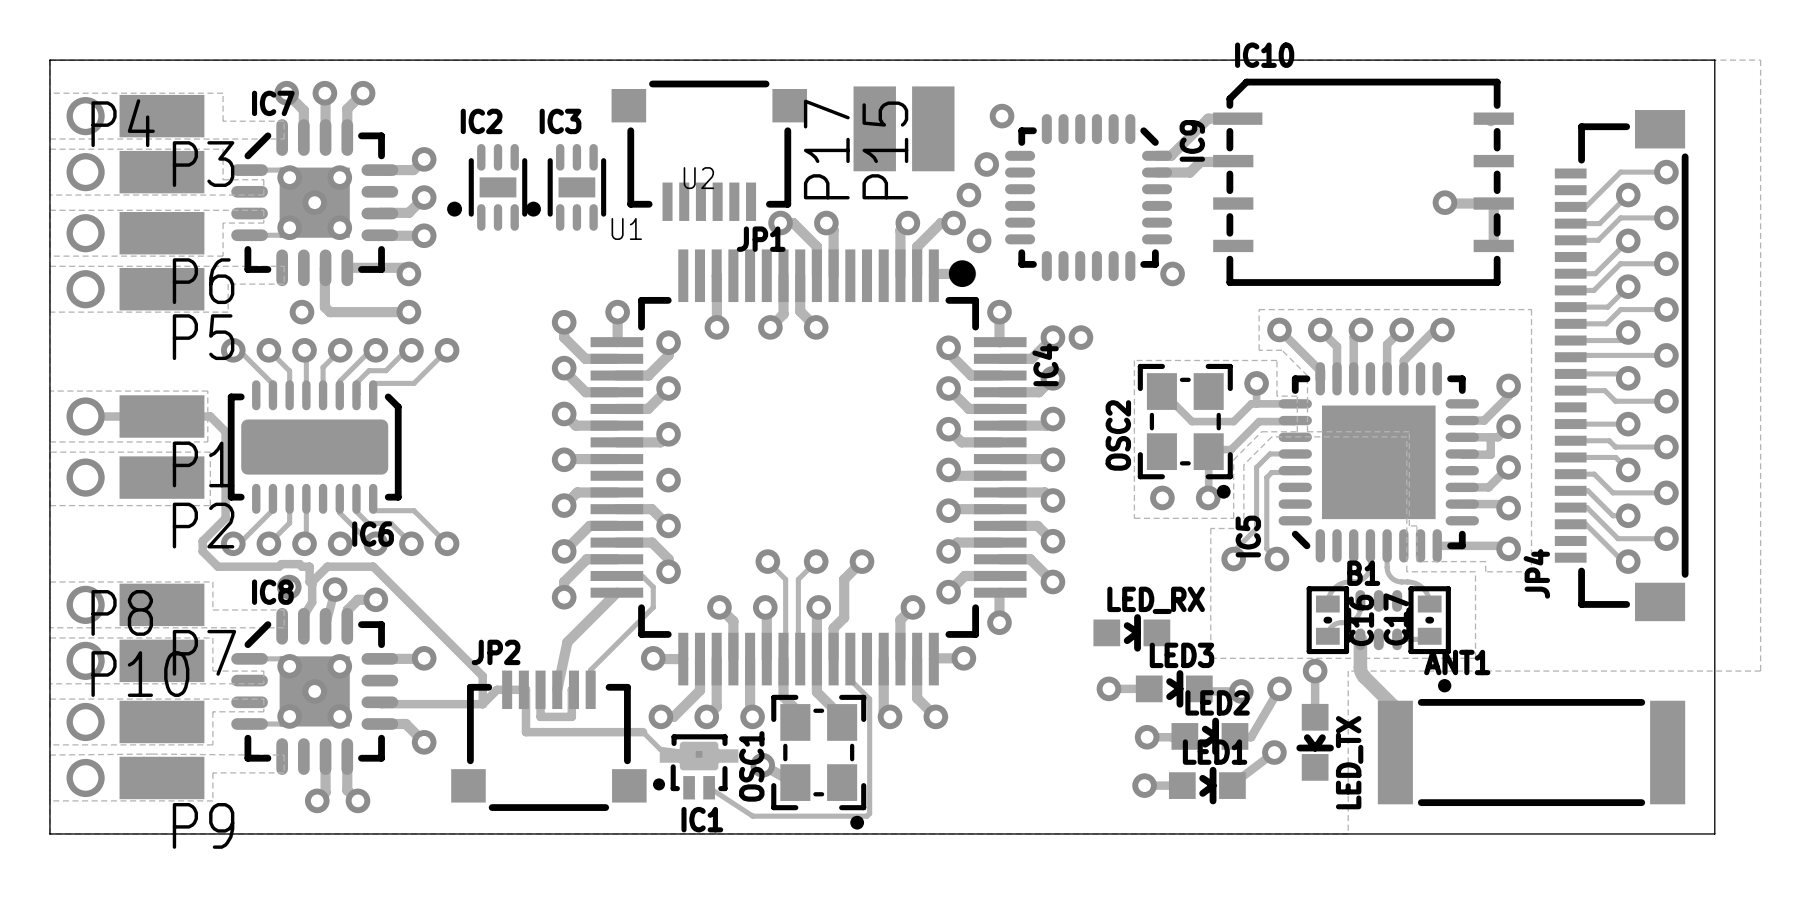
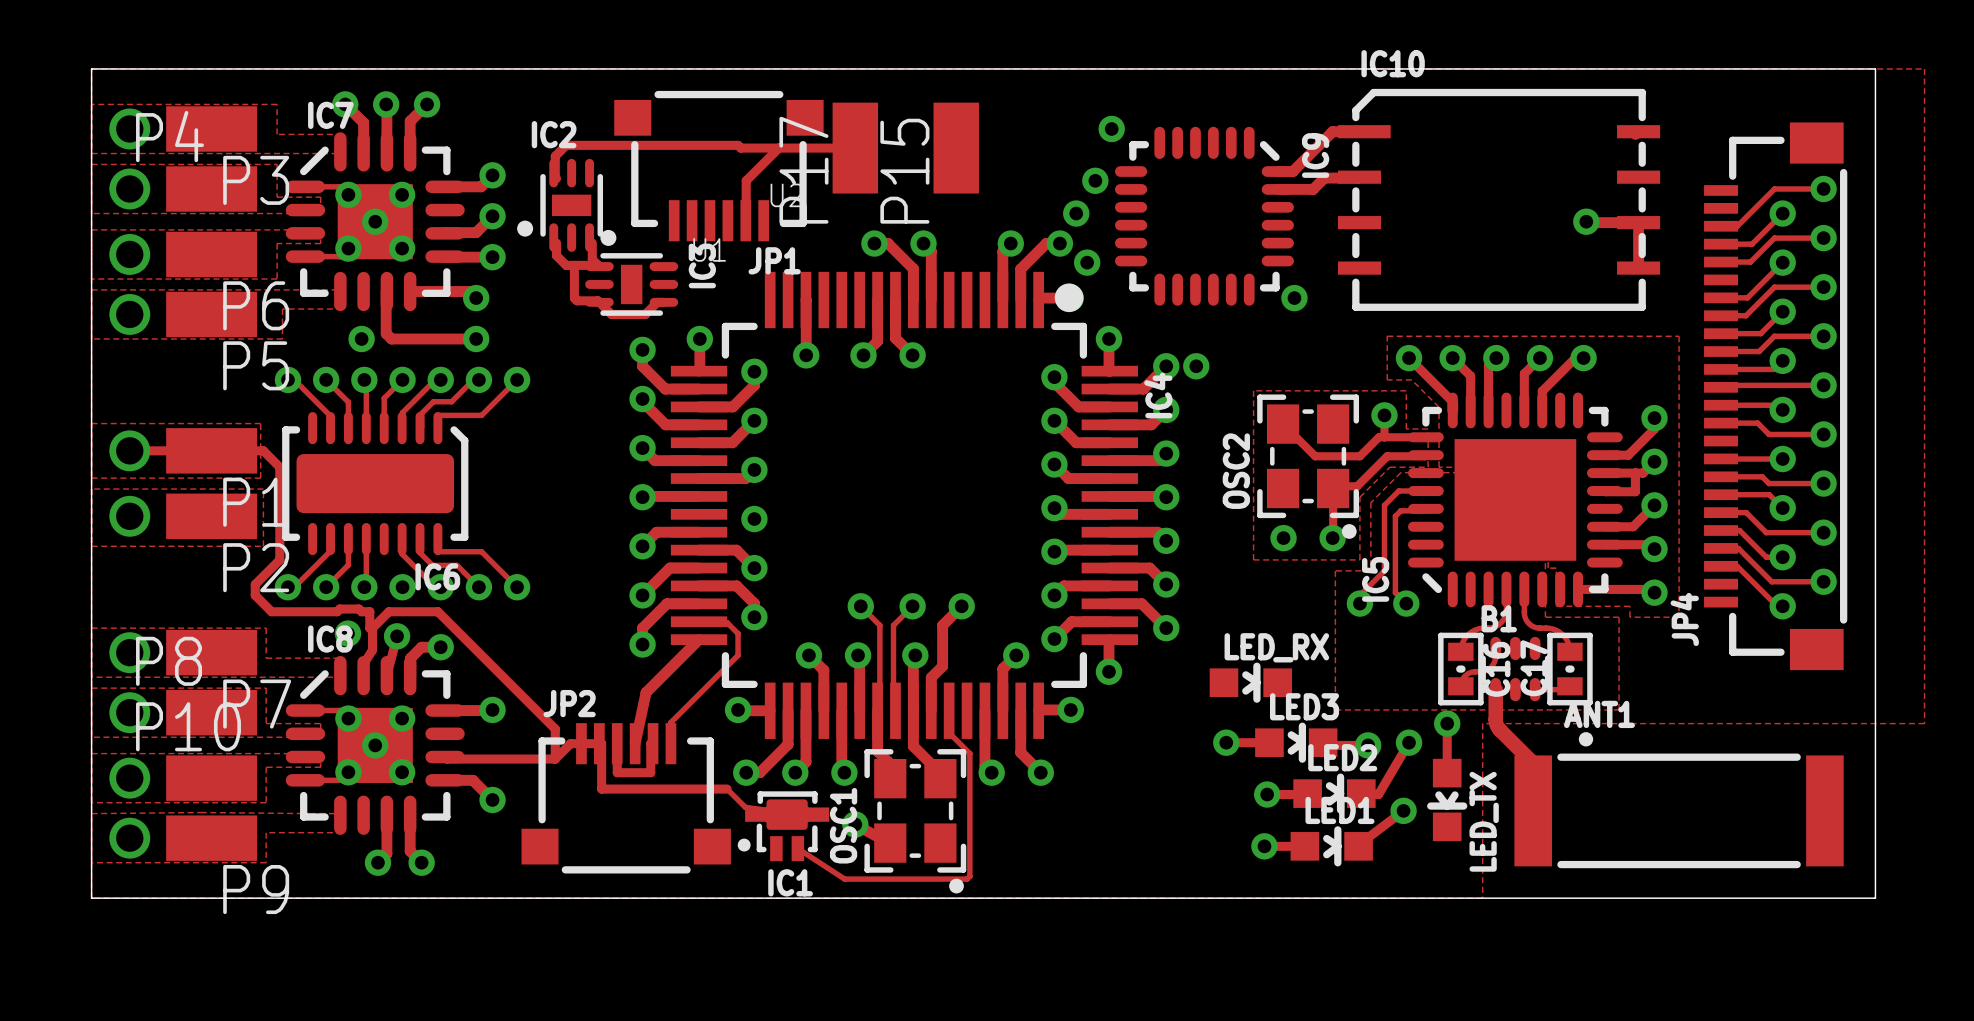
P17 position: (874, 128) -> (855, 148)
P15 position: (933, 128) -> (956, 148)
track: none -> (778, 148) (746, 180) (746, 220)
track: none -> (855, 148) (740, 148) (738, 145) (566, 145) (555, 156) (556, 178)
JP1 position: (709, 150) -> (718, 166)
IC3 rotation: 0° (566, 187) -> 90° clockwise (631, 272)
IC3 position: (566, 187) -> (631, 272)
track: none -> (556, 243) (556, 255) (566, 265) (598, 265)
track: none -> (592, 243) (592, 259) (599, 266)
track: none -> (574, 265) (574, 298) (577, 300) (597, 300) (611, 314) (645, 314) (657, 302) (663, 302)

